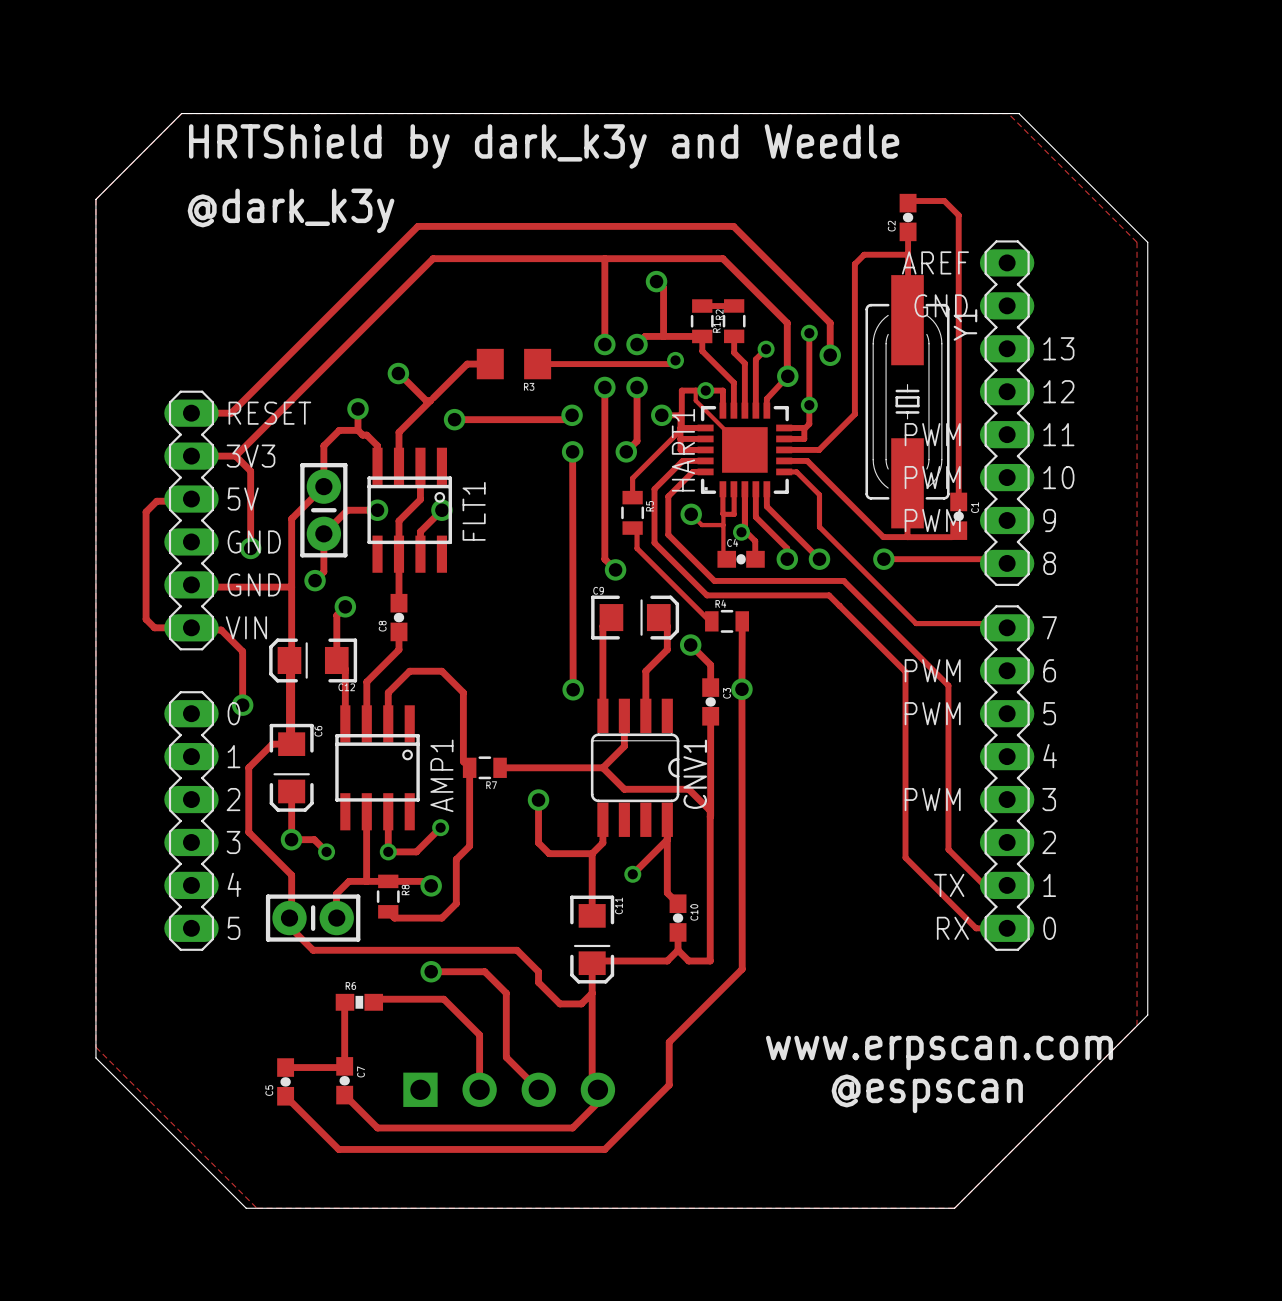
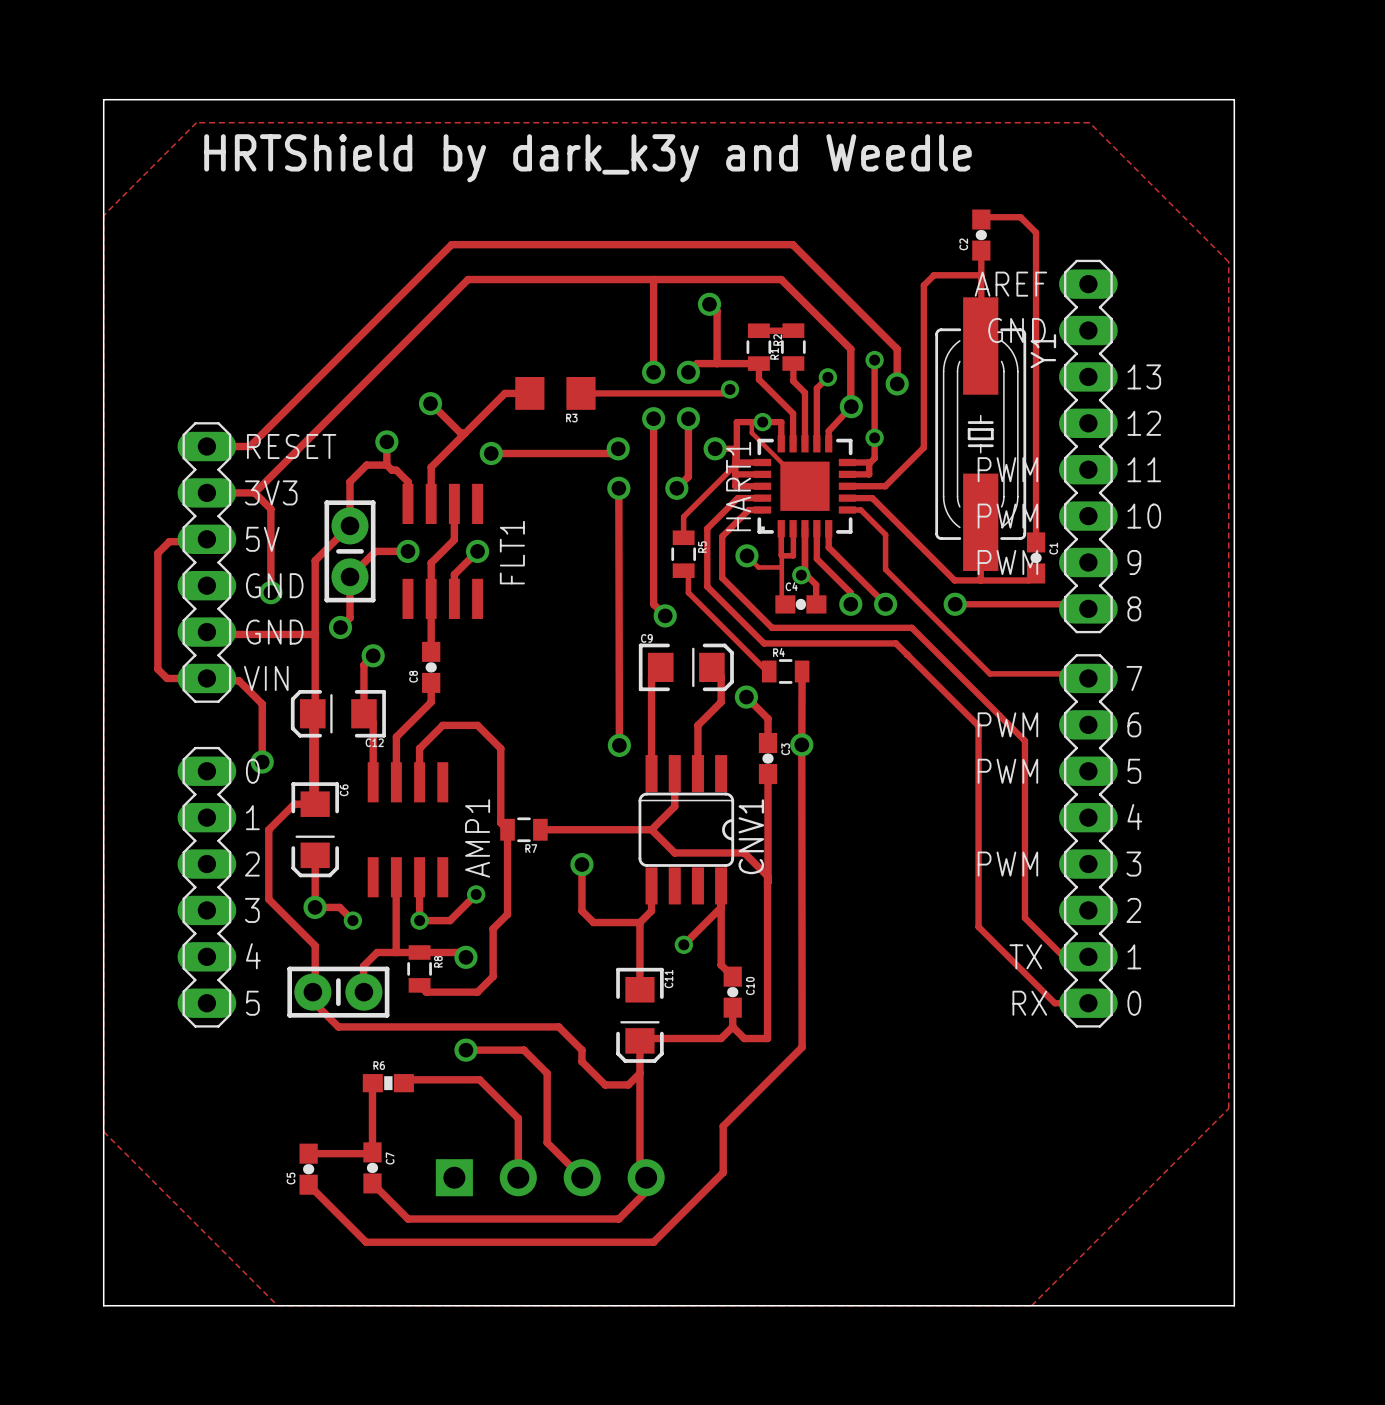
board edge: (181, 113) (1018, 113) (1147, 242) (1147, 1015) (954, 1208) -> (103, 215) (103, 99) (1234, 99) (1234, 1305) (1031, 1305)
board edge: (181, 113) (95, 199) -> none
text: @dark_k3y (291, 210) -> none
FLT1 footprint: [367, 447, 453, 573] -> [402, 483, 484, 619]
AMP1 footprint: [335, 705, 420, 831] -> [367, 762, 449, 898]
text: www.erpscan.com (939, 1053) -> none
board edge: (95, 1058) (246, 1208) -> (103, 1143) (103, 1305) (266, 1305)
text: @espscan (927, 1093) -> none

